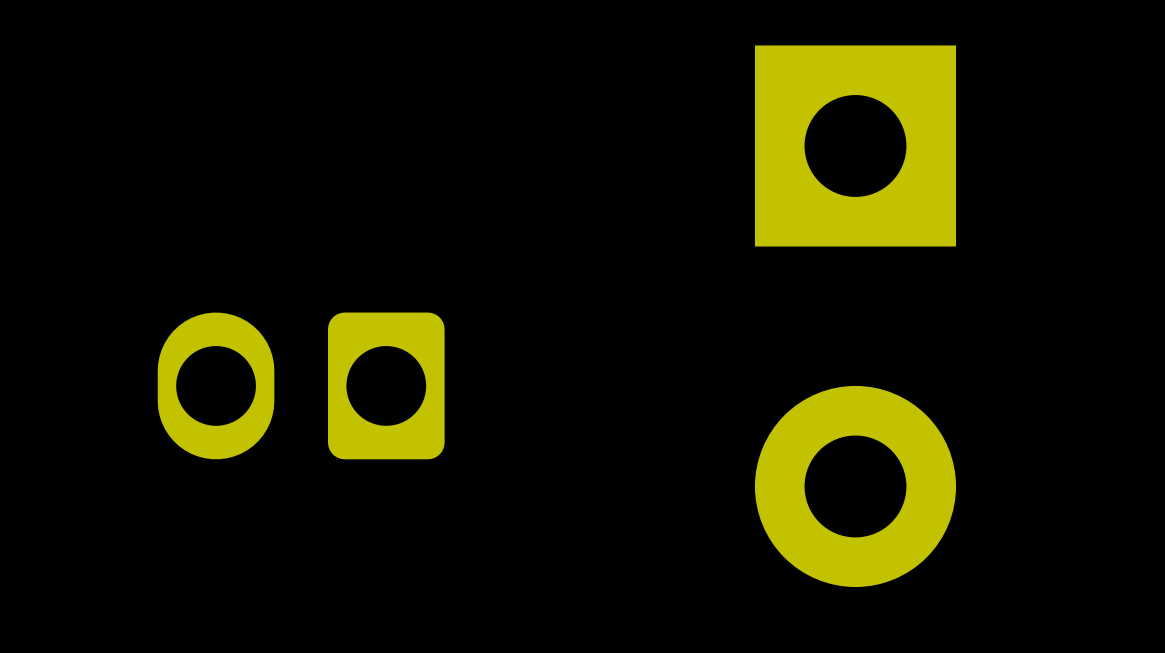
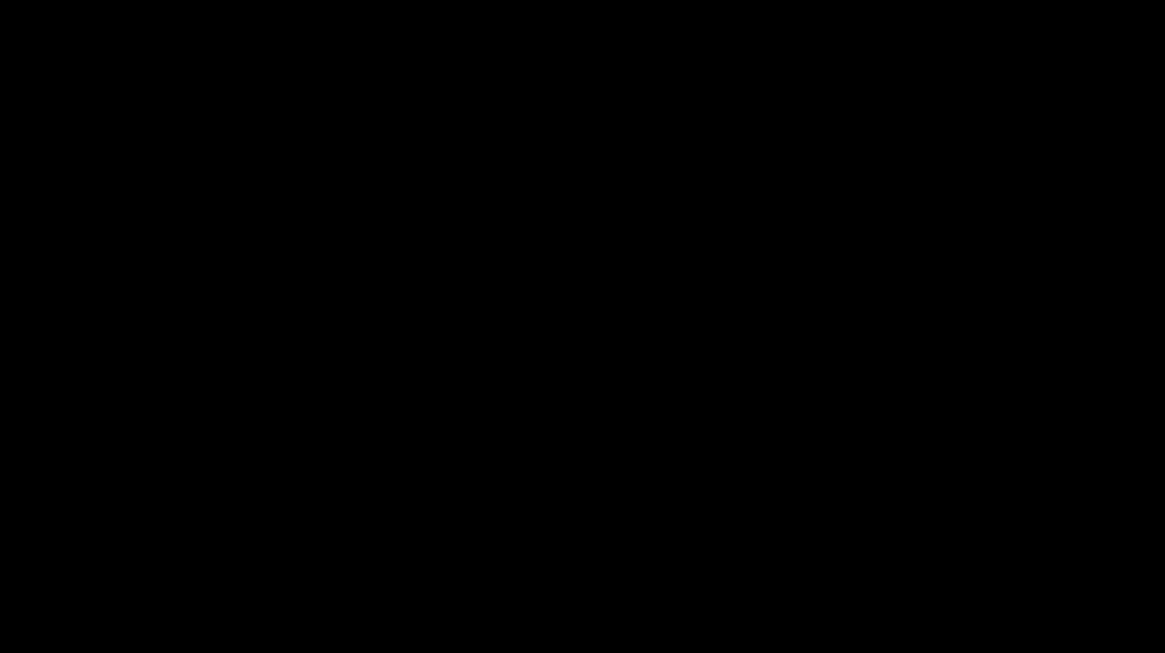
part: (855, 316) -> none
part: (301, 385) -> none

